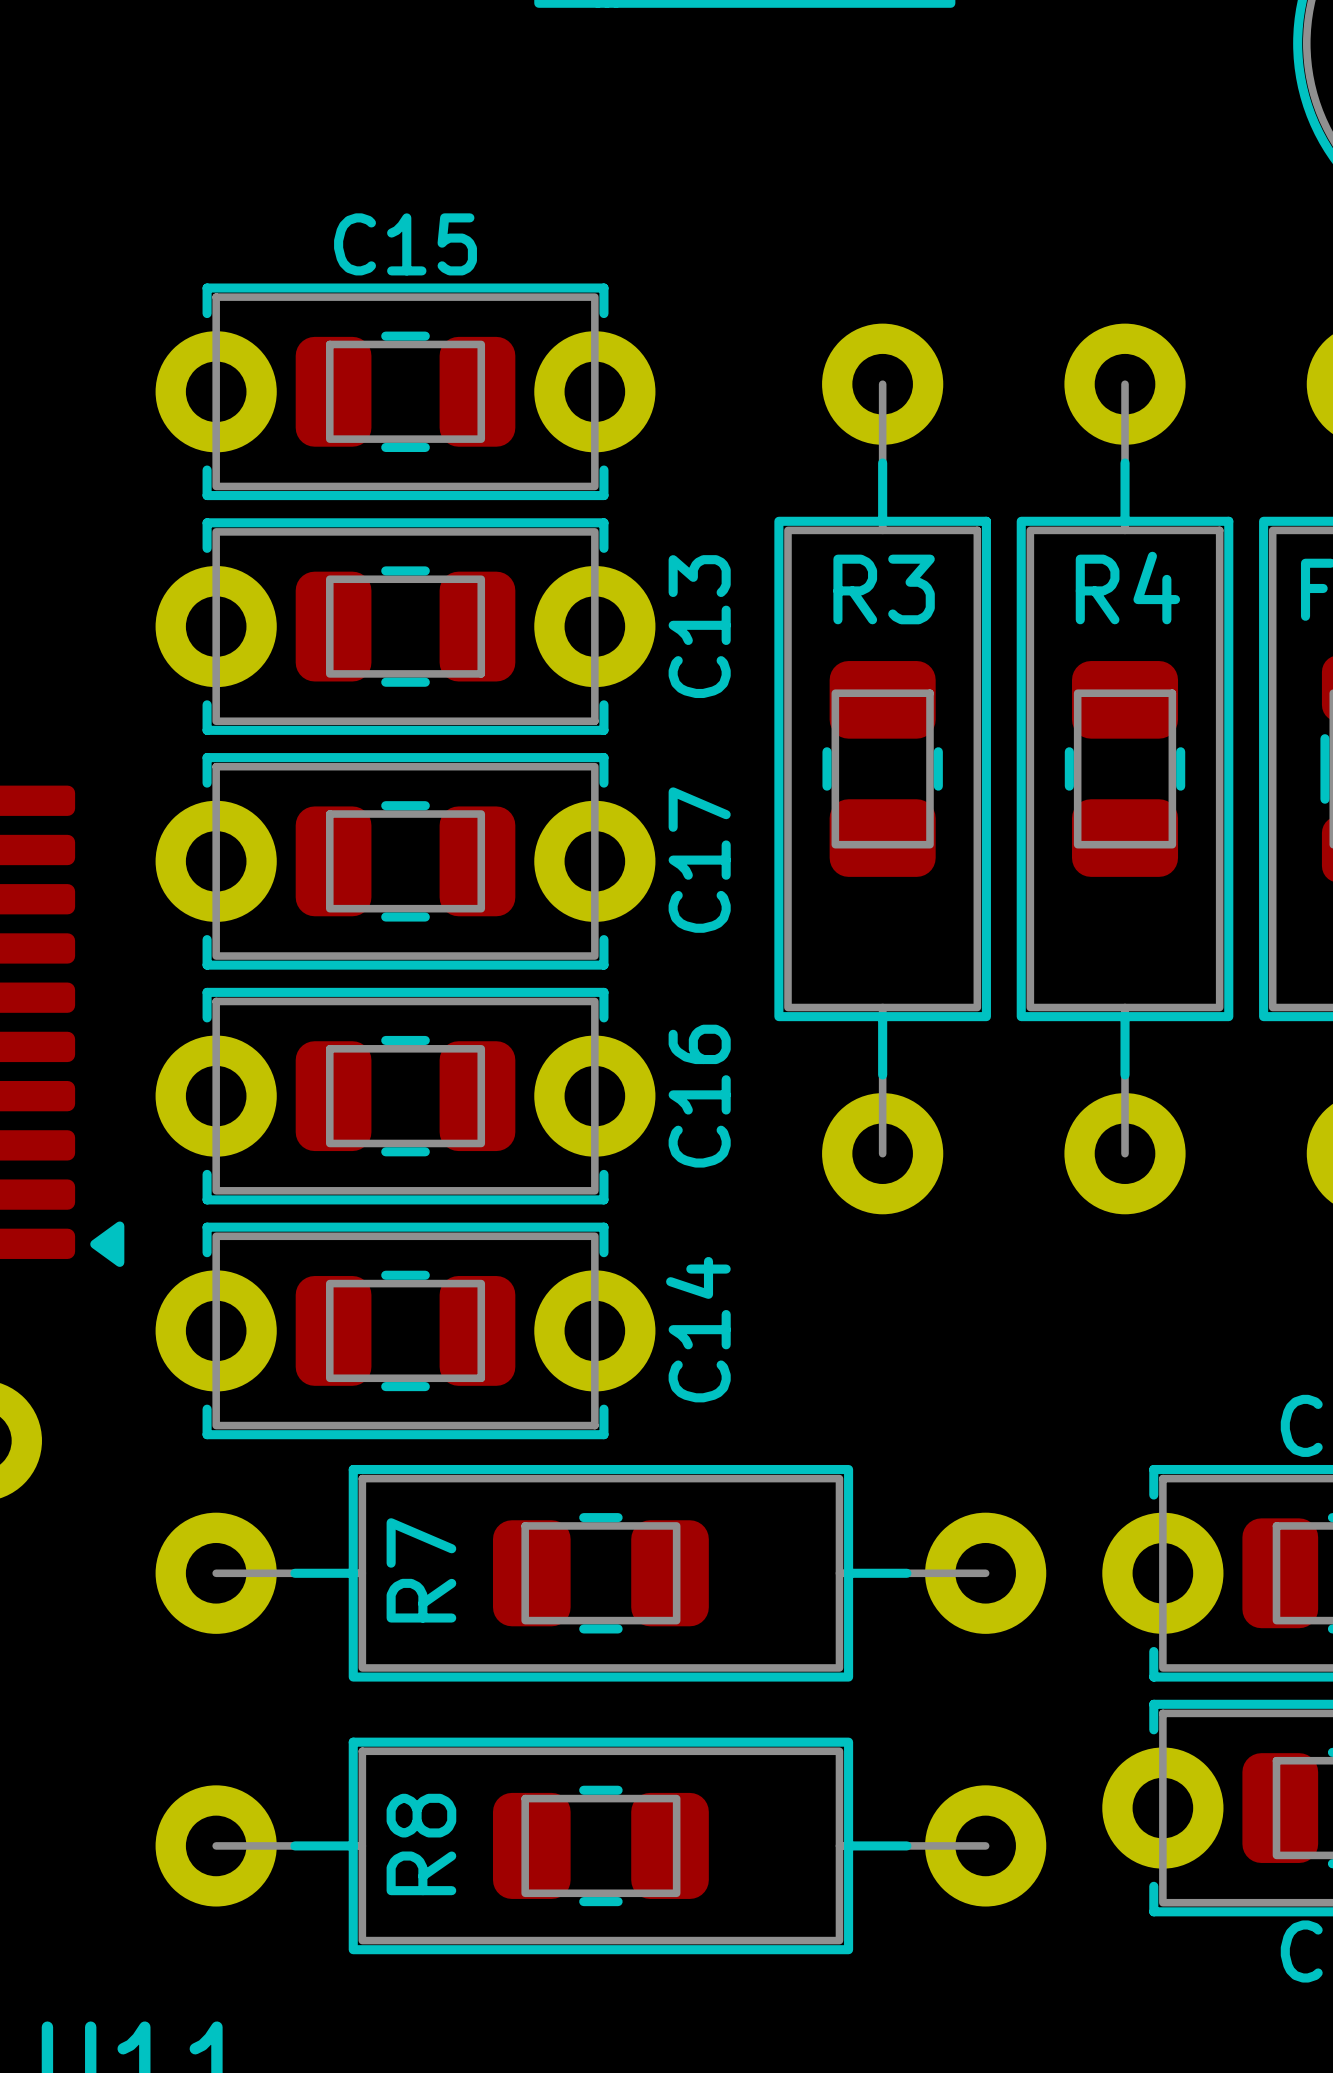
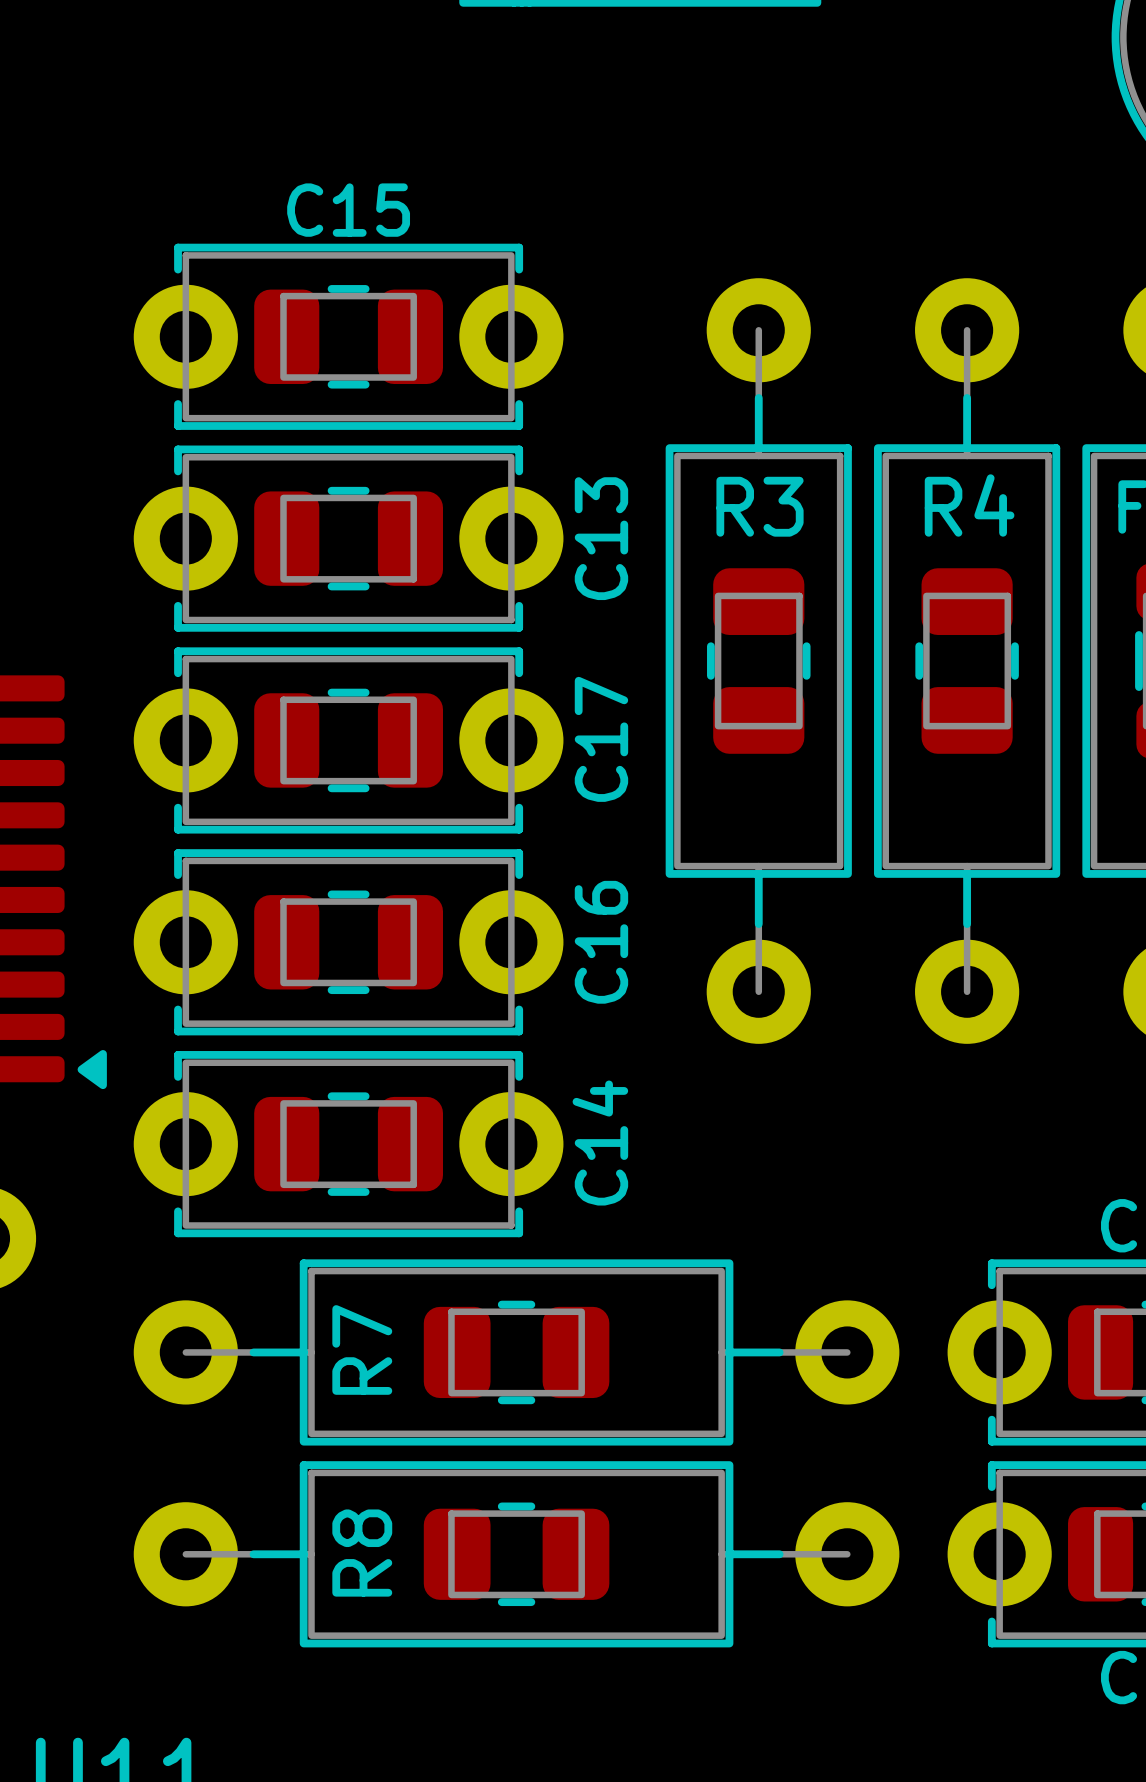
R8 position: (600, 1845) -> (516, 1554)

